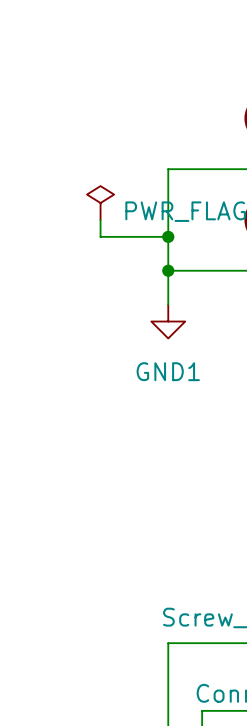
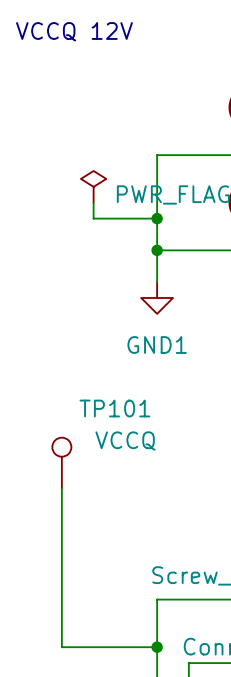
text: none -> VCCQ 12V (74, 31)
TP101: none -> VCCQ (61, 463)
wire: none -> (61, 488) (61, 647) (157, 647)
junction: none -> (157, 647)

